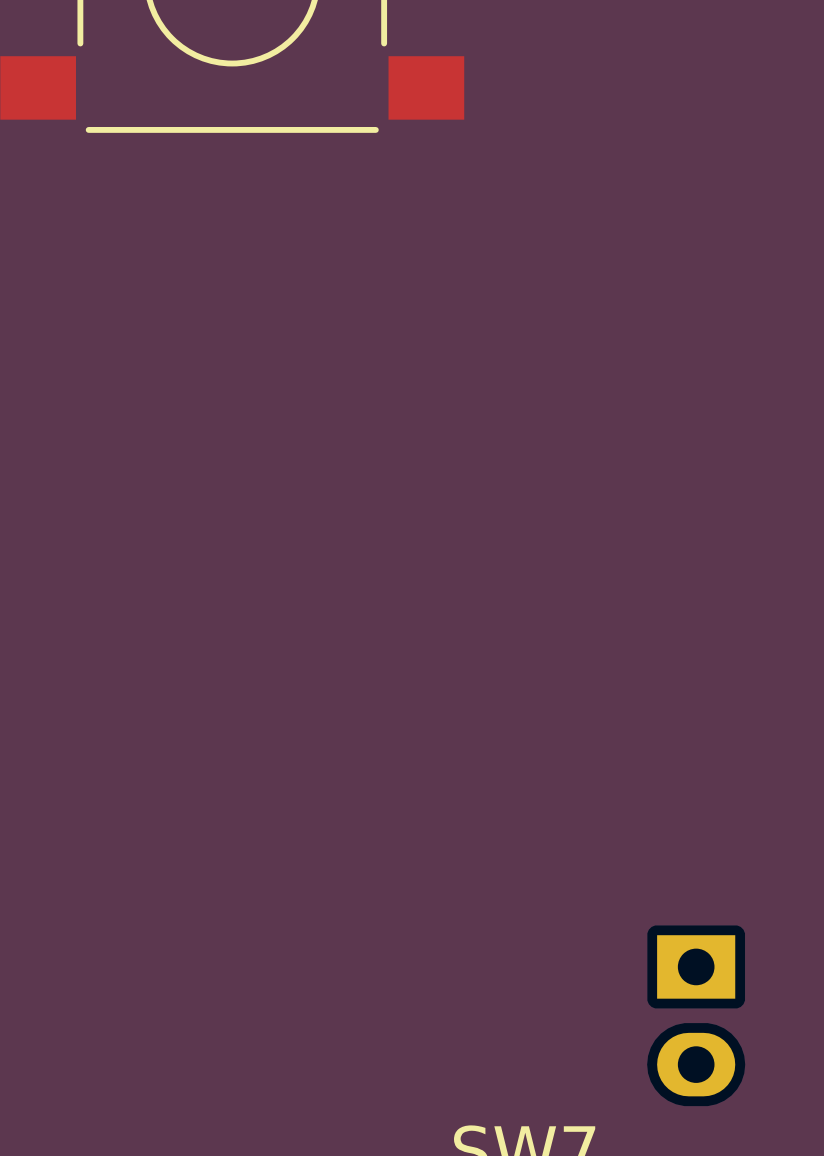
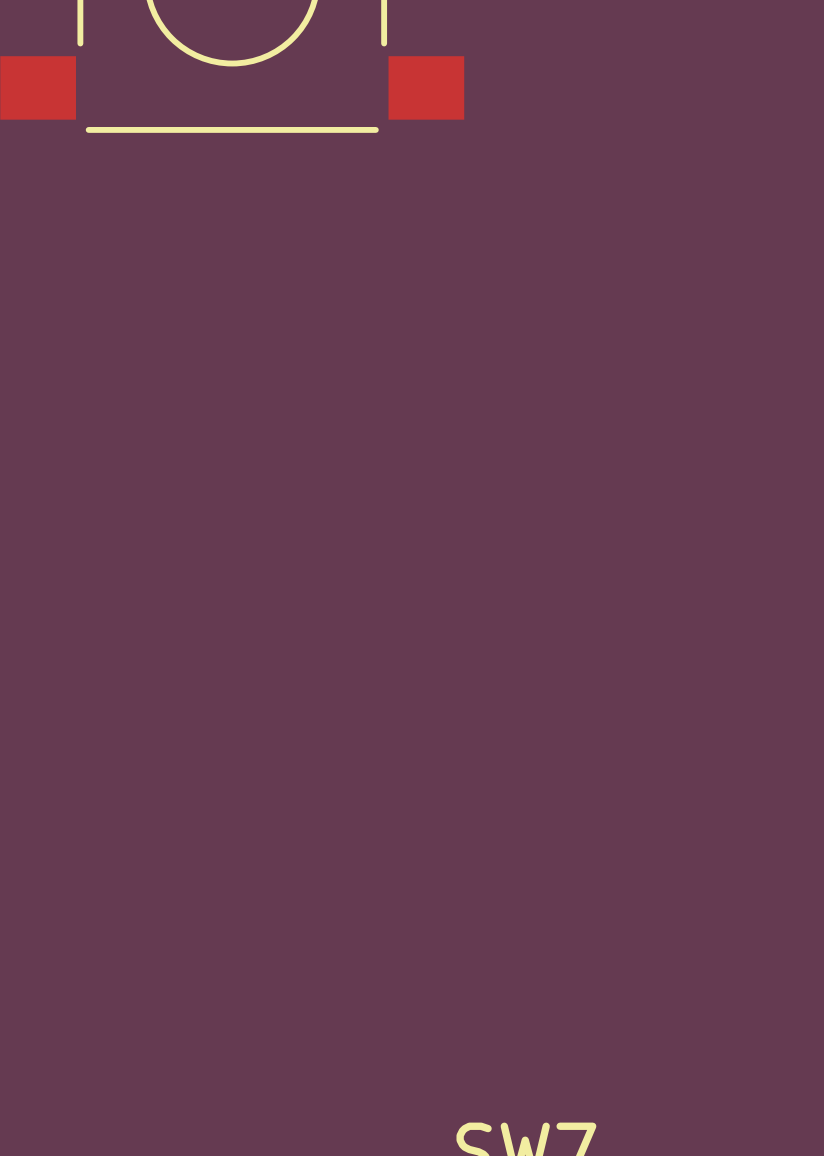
part: (696, 1015) -> none

